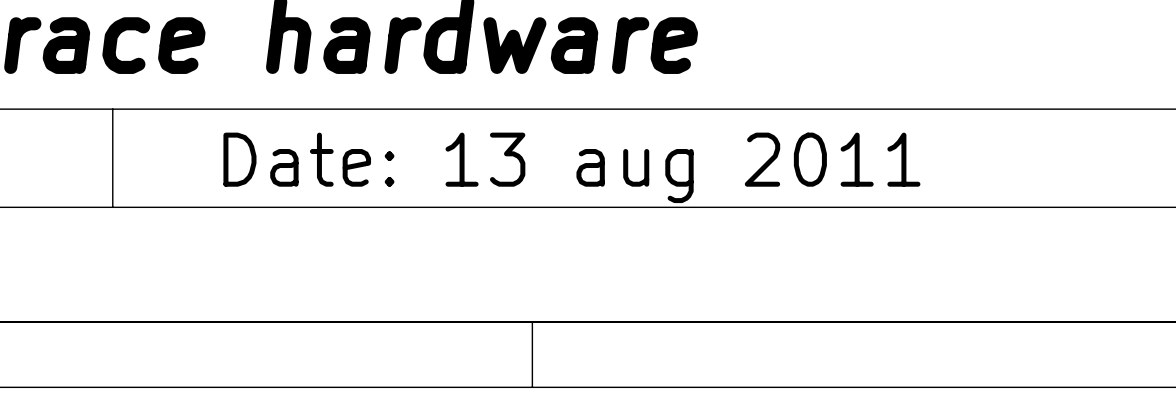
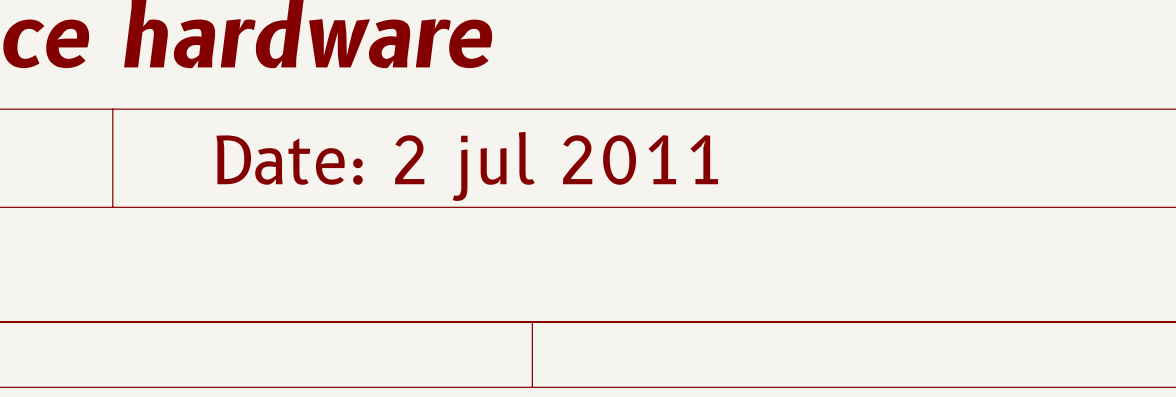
title block: Date: 13 aug 2011 (571, 167) -> Date: 2 jul 2011 (467, 166)

